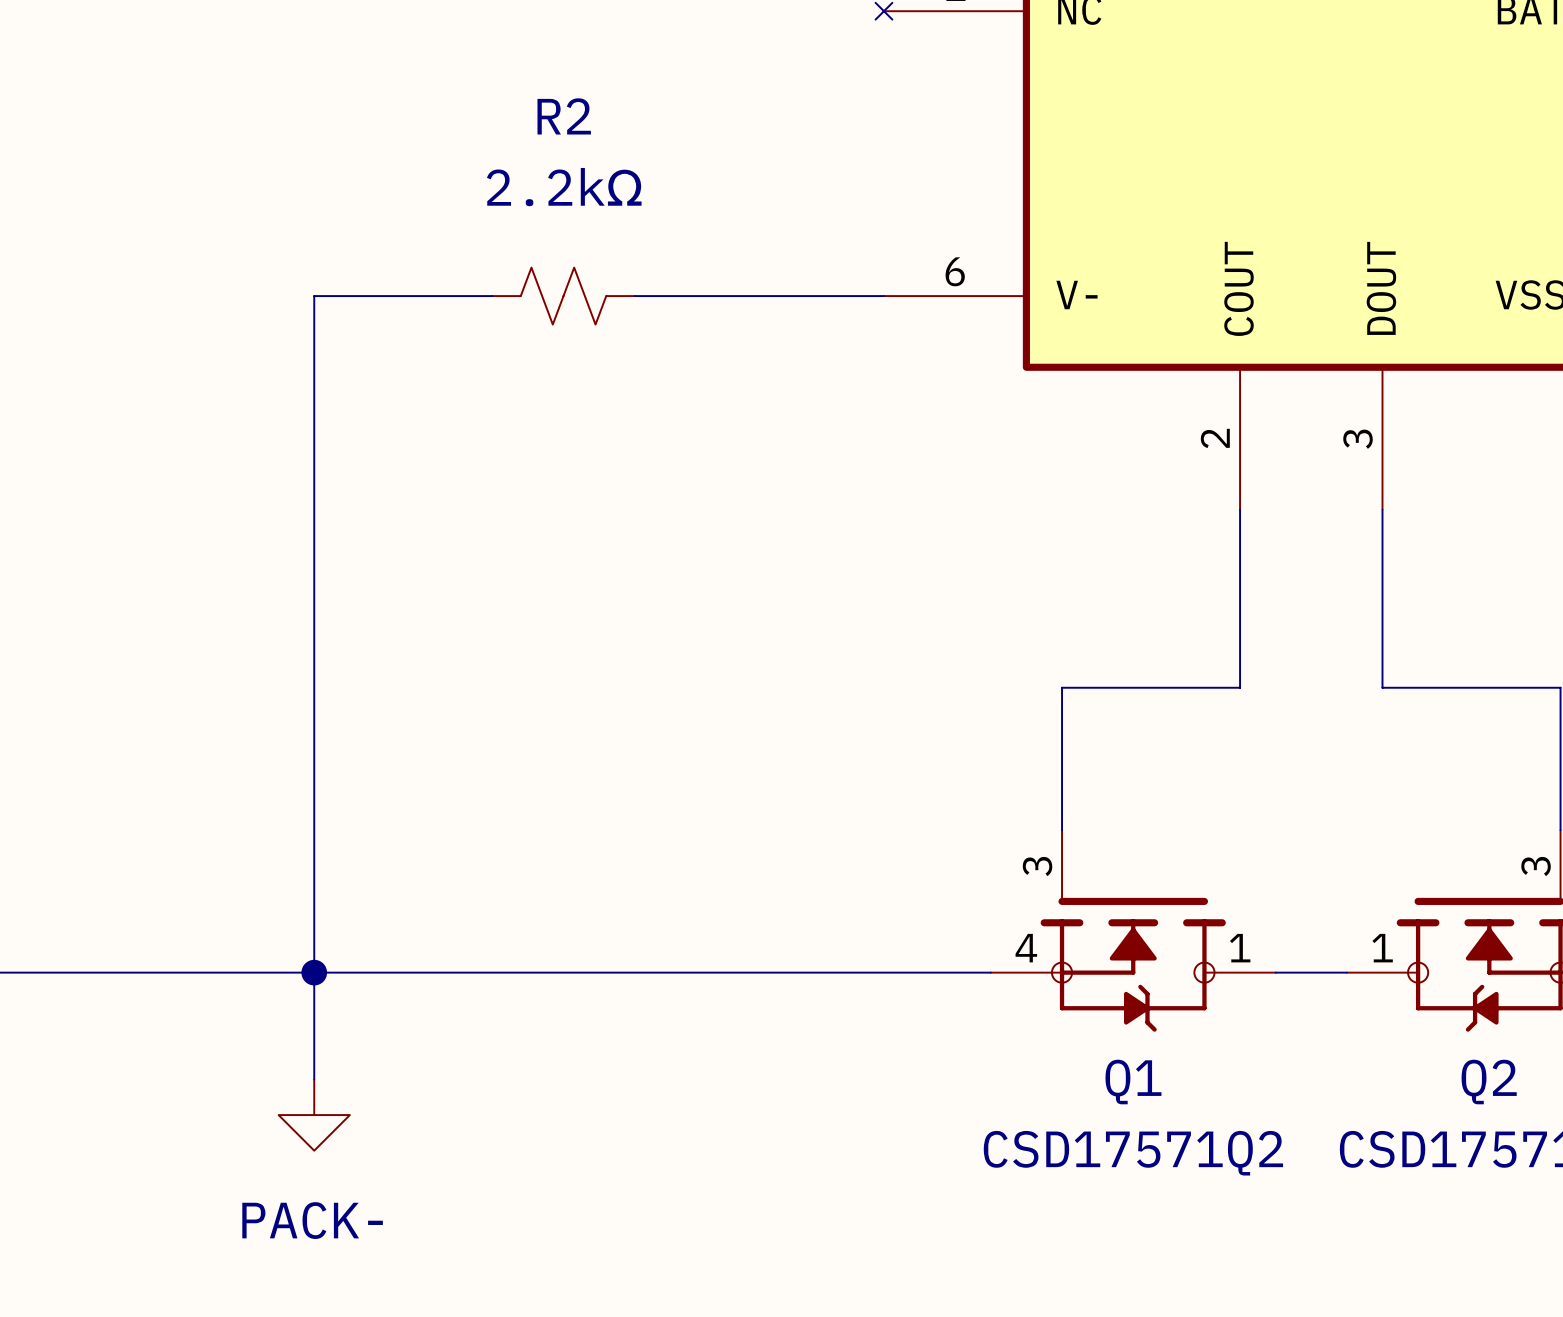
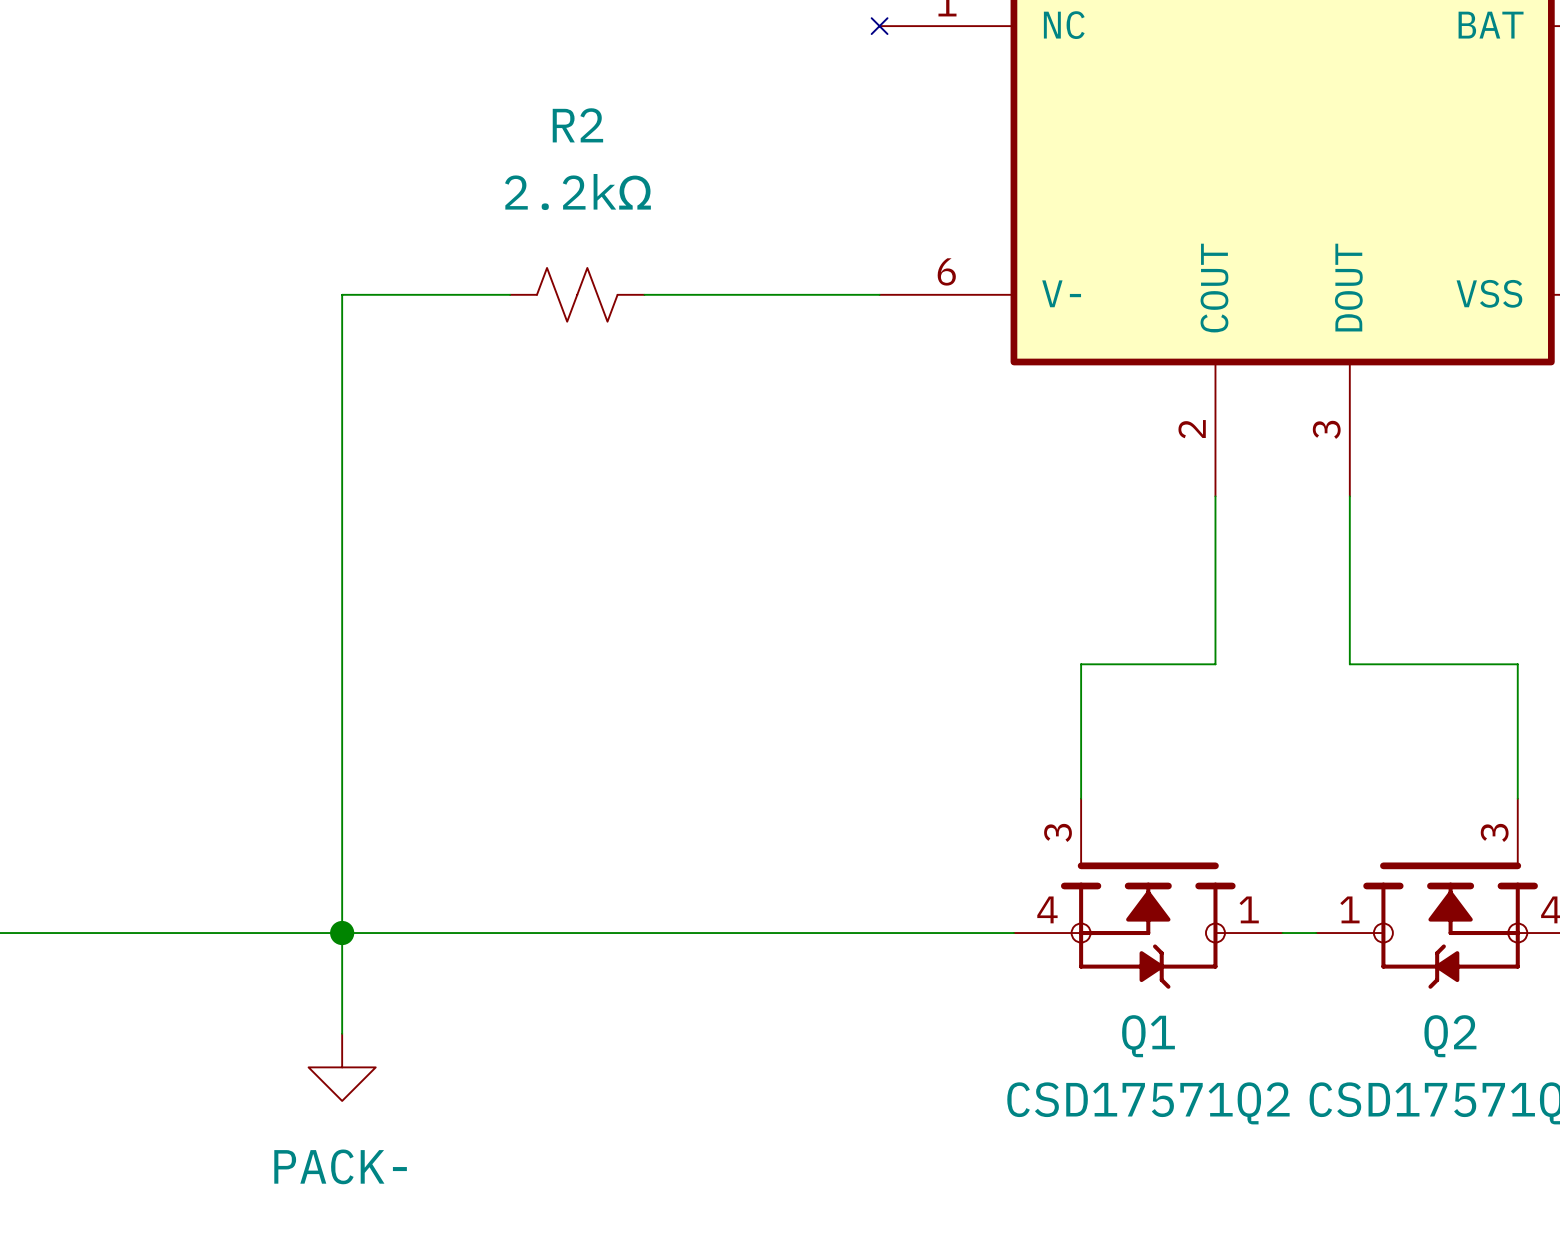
wire: (1097, 687) (1062, 687) (1062, 830) -> (1081, 664) (1081, 798)
Q1 position: (1133, 930) -> (1148, 893)

